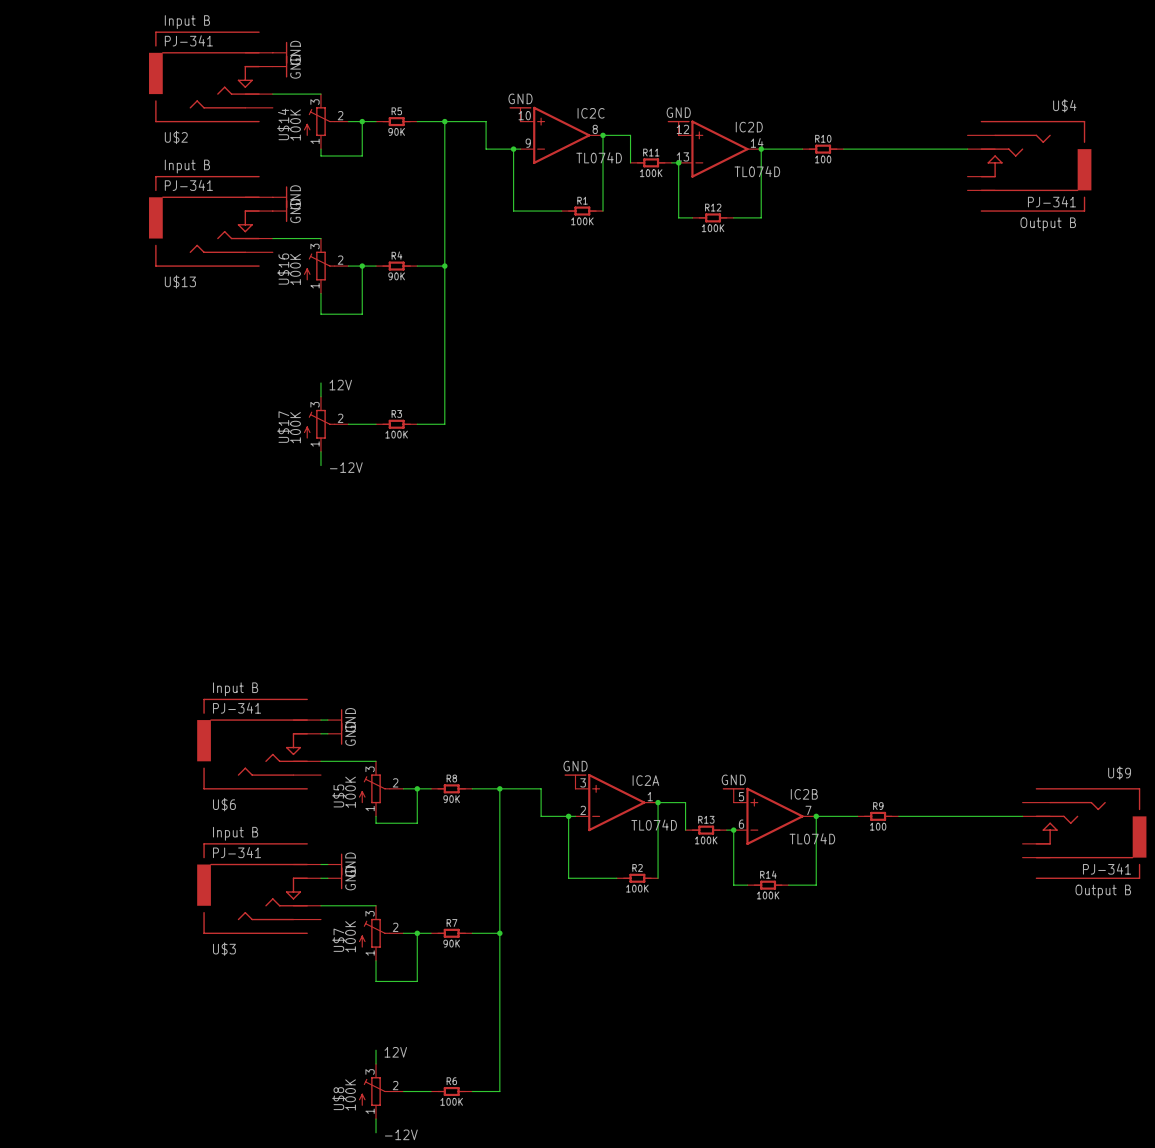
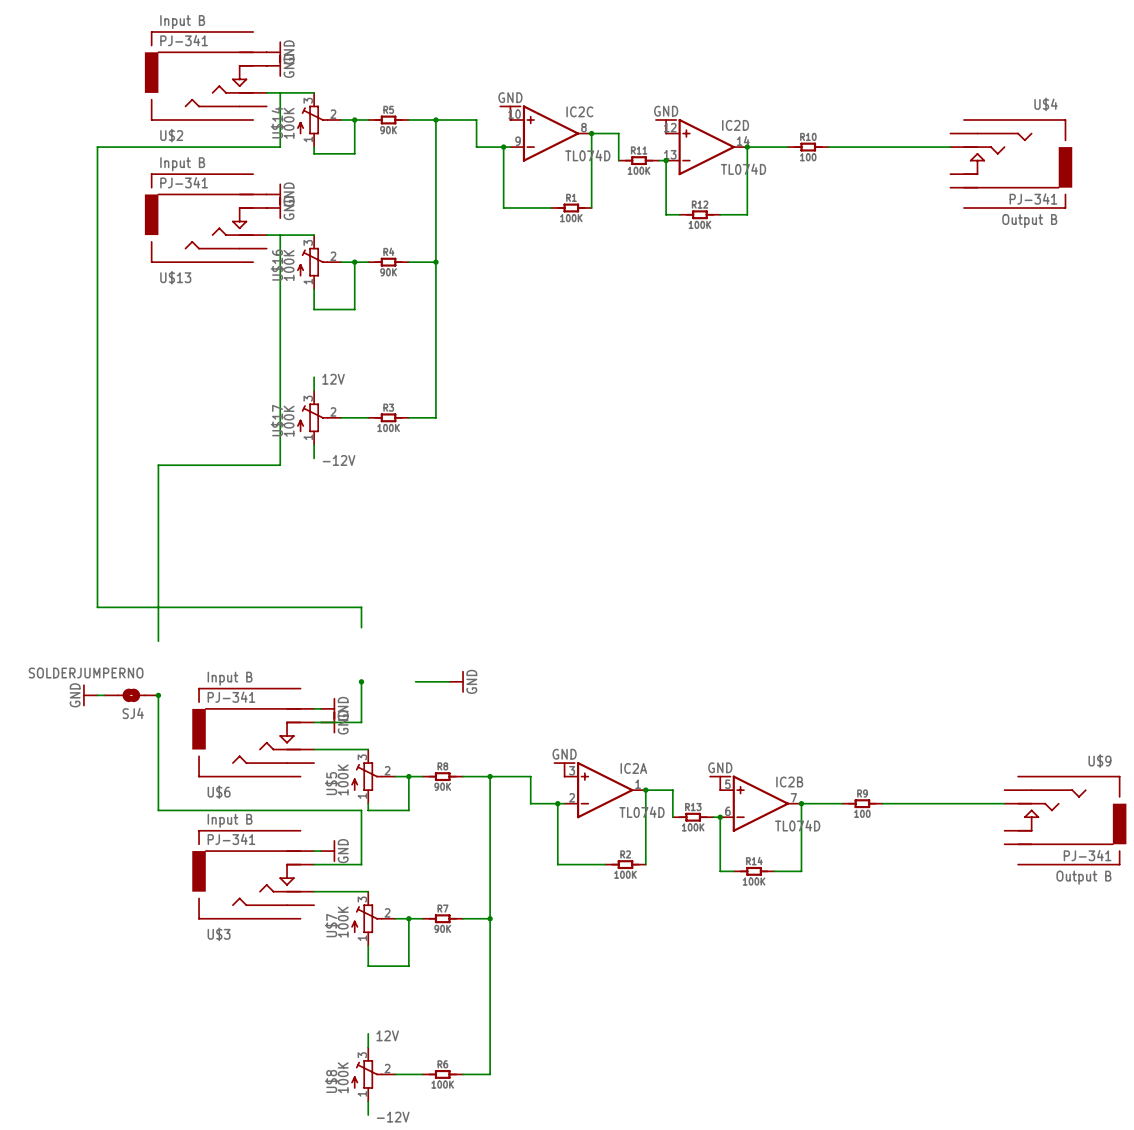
wire: none -> (280, 92) (280, 147) (97, 147) (97, 607) (361, 607) (361, 627)
wire: none -> (280, 235) (280, 465) (158, 465) (158, 641)
wire: none -> (361, 681) (361, 722) (320, 722)
junction: none -> (361, 681)
wire: none -> (415, 681) (449, 681)
power symbol: none -> GND (456, 681)
power symbol: none -> GND (90, 695)
wire: none -> (97, 695) (104, 695)
SJ4: none -> SOLDERJUMPERNO (131, 695)
wire: none -> (158, 695) (158, 810) (361, 810) (361, 864) (320, 864)
junction: none -> (158, 695)
power symbol: GND (335, 878) -> none

